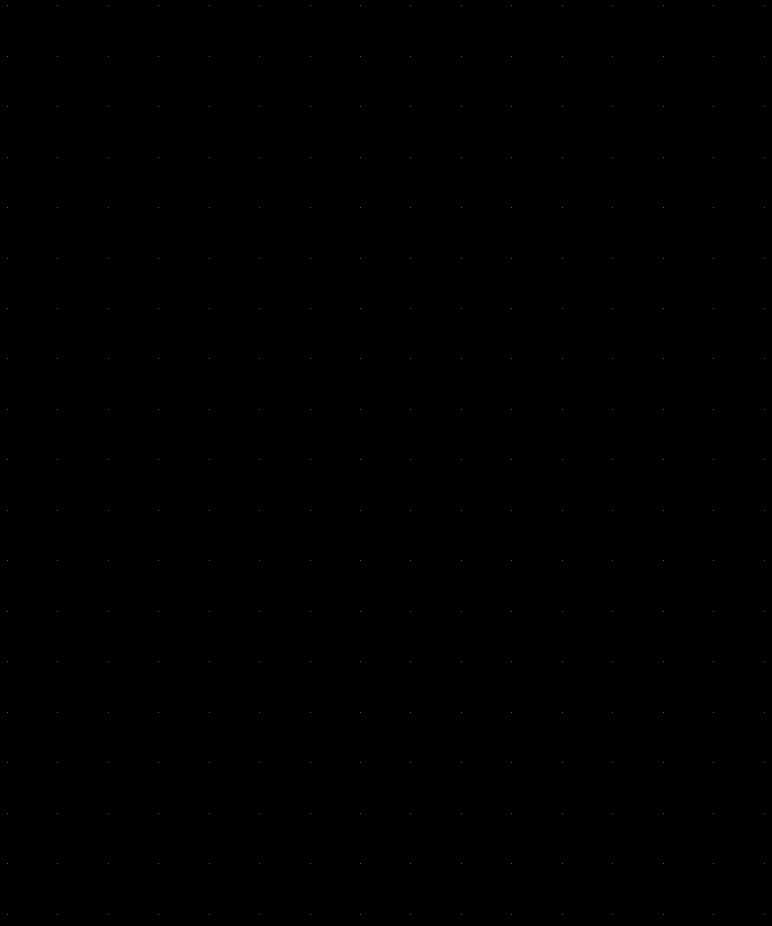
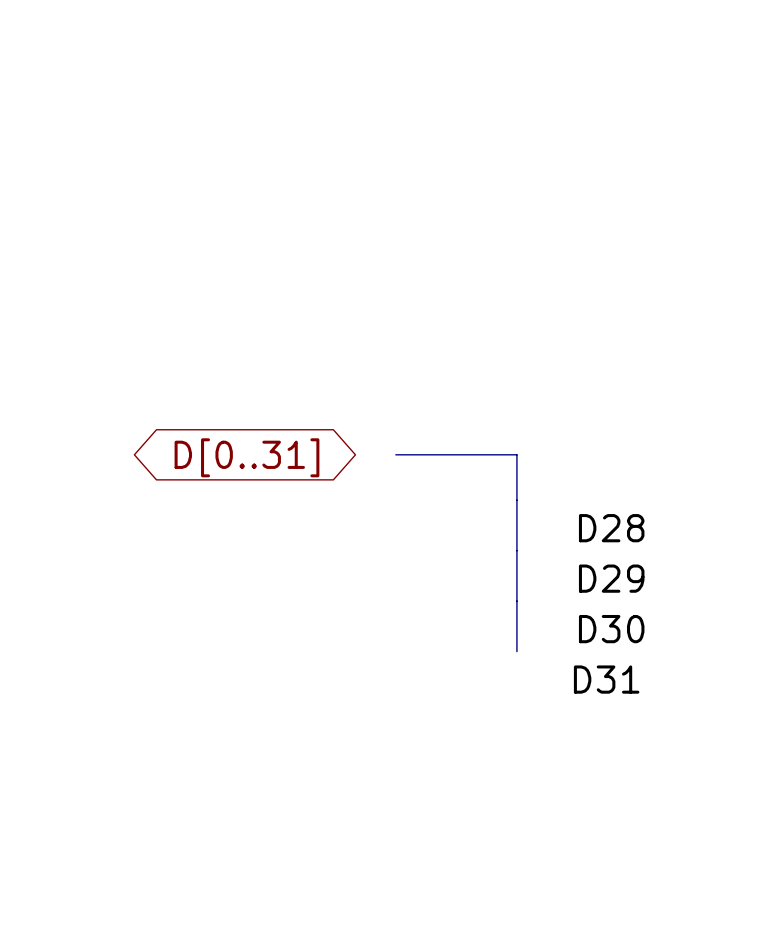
bus: none -> (395, 454) (516, 454) (516, 651)
global label: none -> D[0..31] (246, 457)
label: none -> D28 (611, 528)
label: none -> D29 (611, 578)
label: none -> D30 (611, 629)
label: none -> D31 (606, 679)

